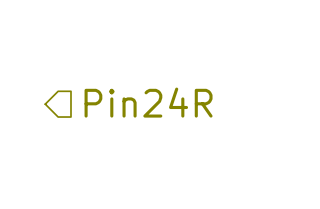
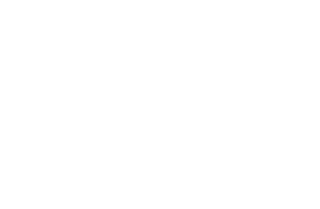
hierarchical label: Pin24R (148, 102) -> none

